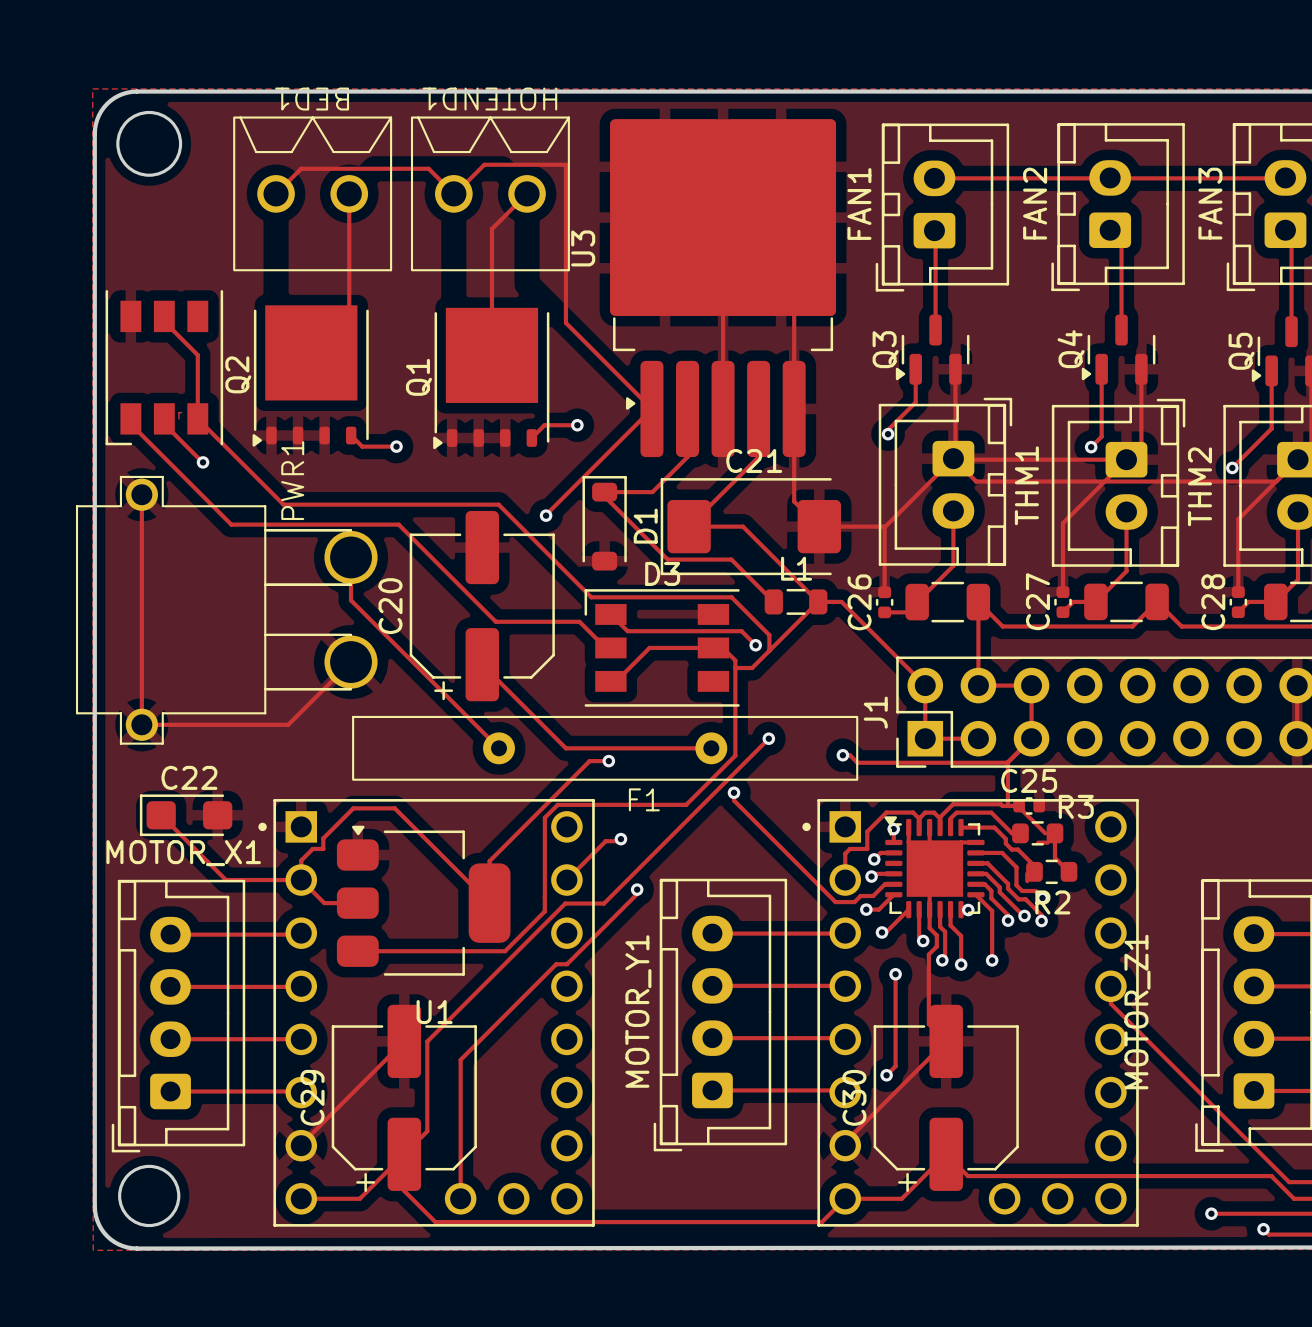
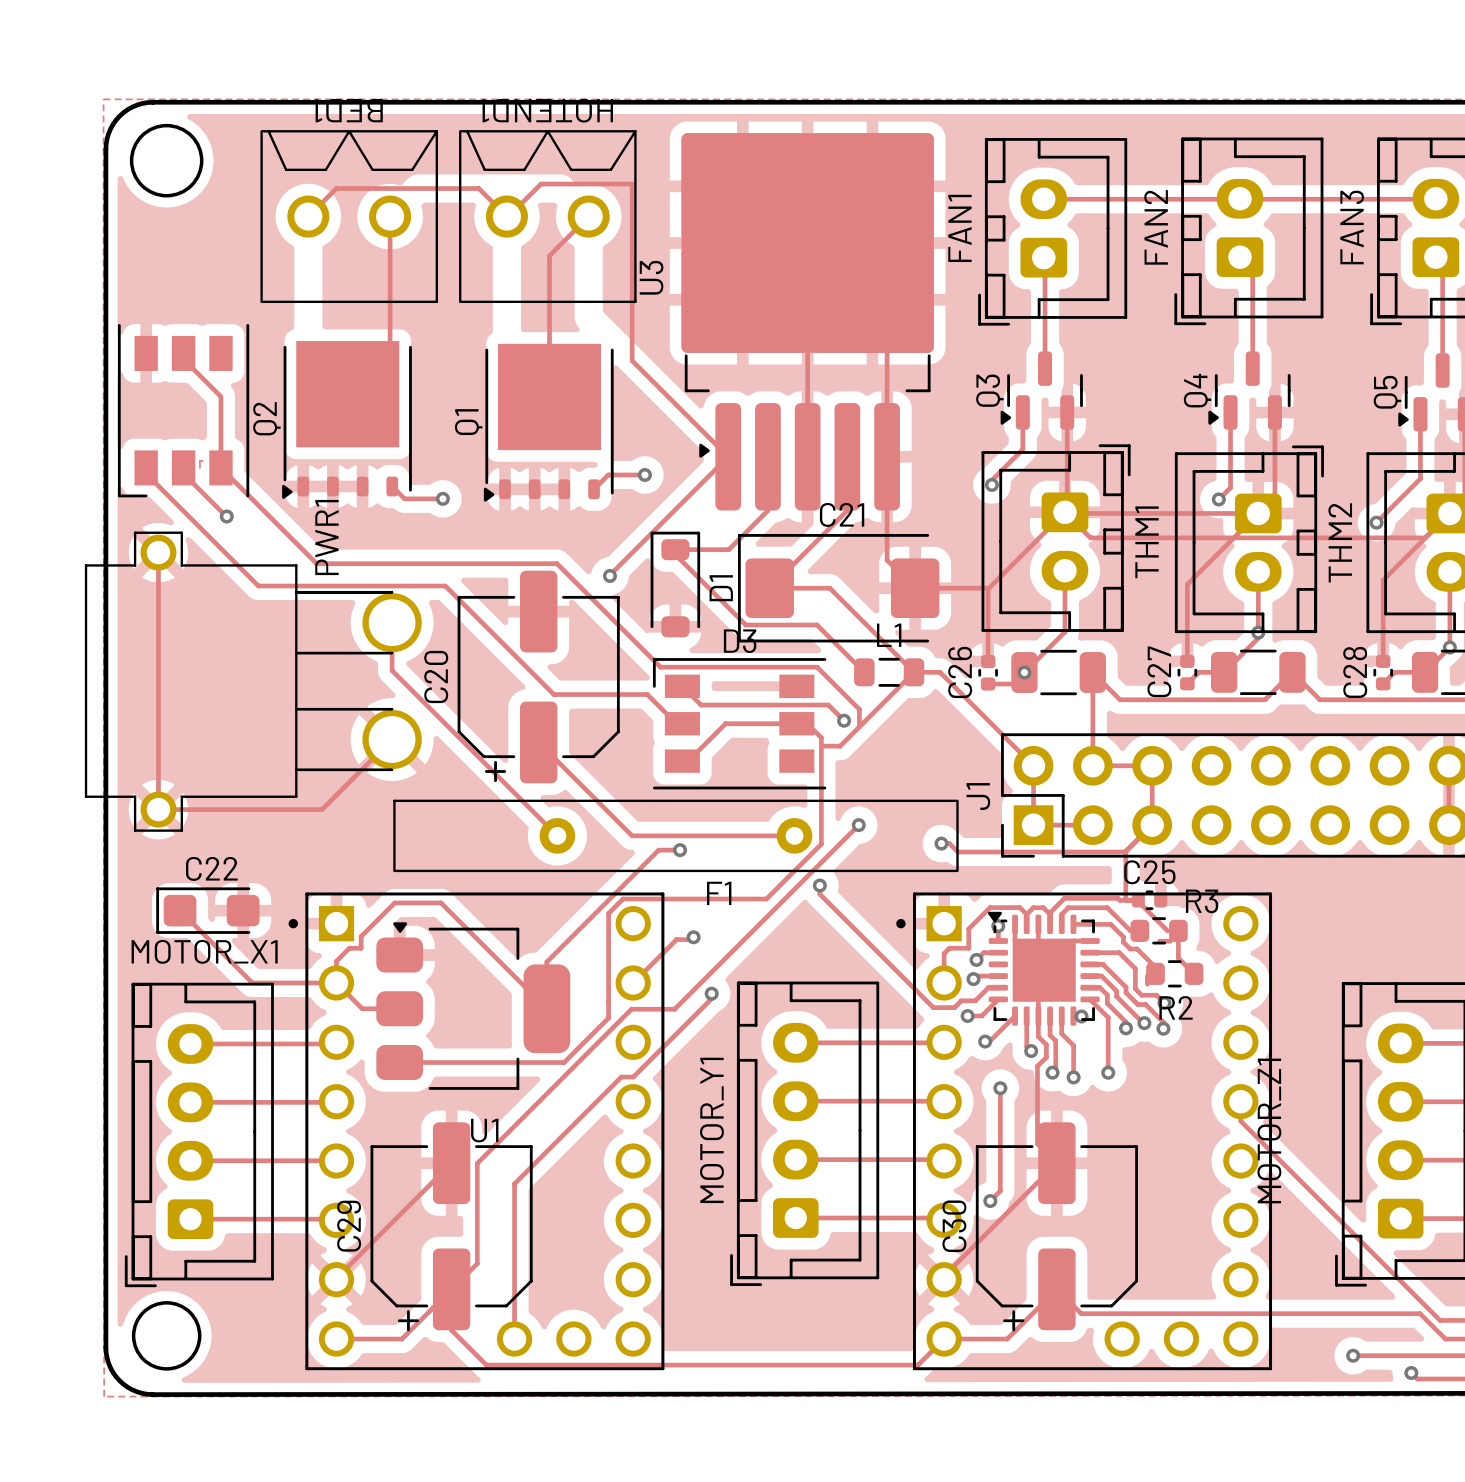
via: none -> (1258, 632)
via: none -> (1449, 647)
via: none -> (1024, 672)

